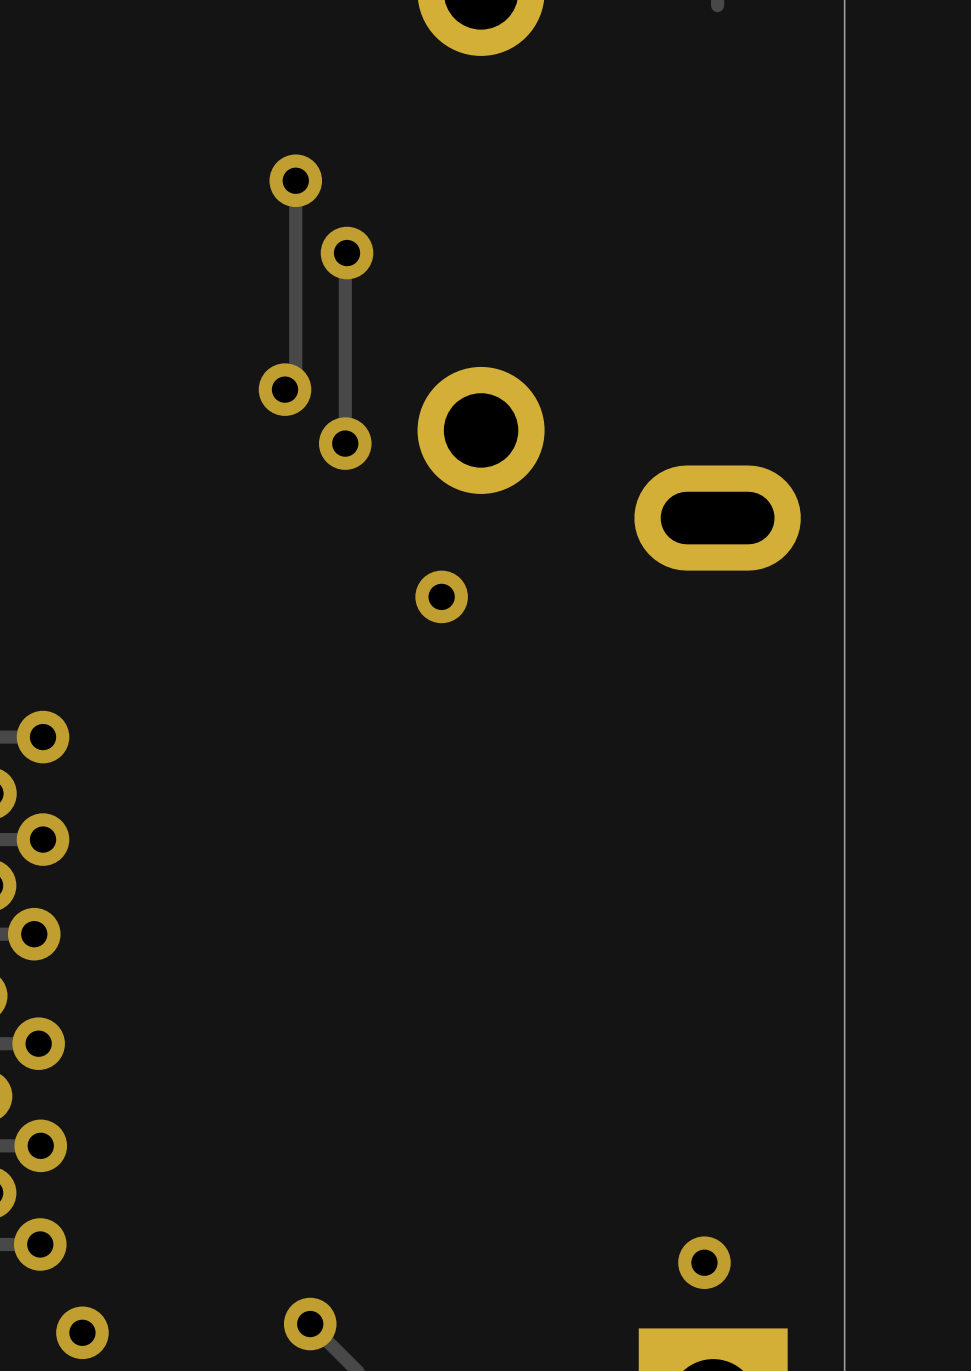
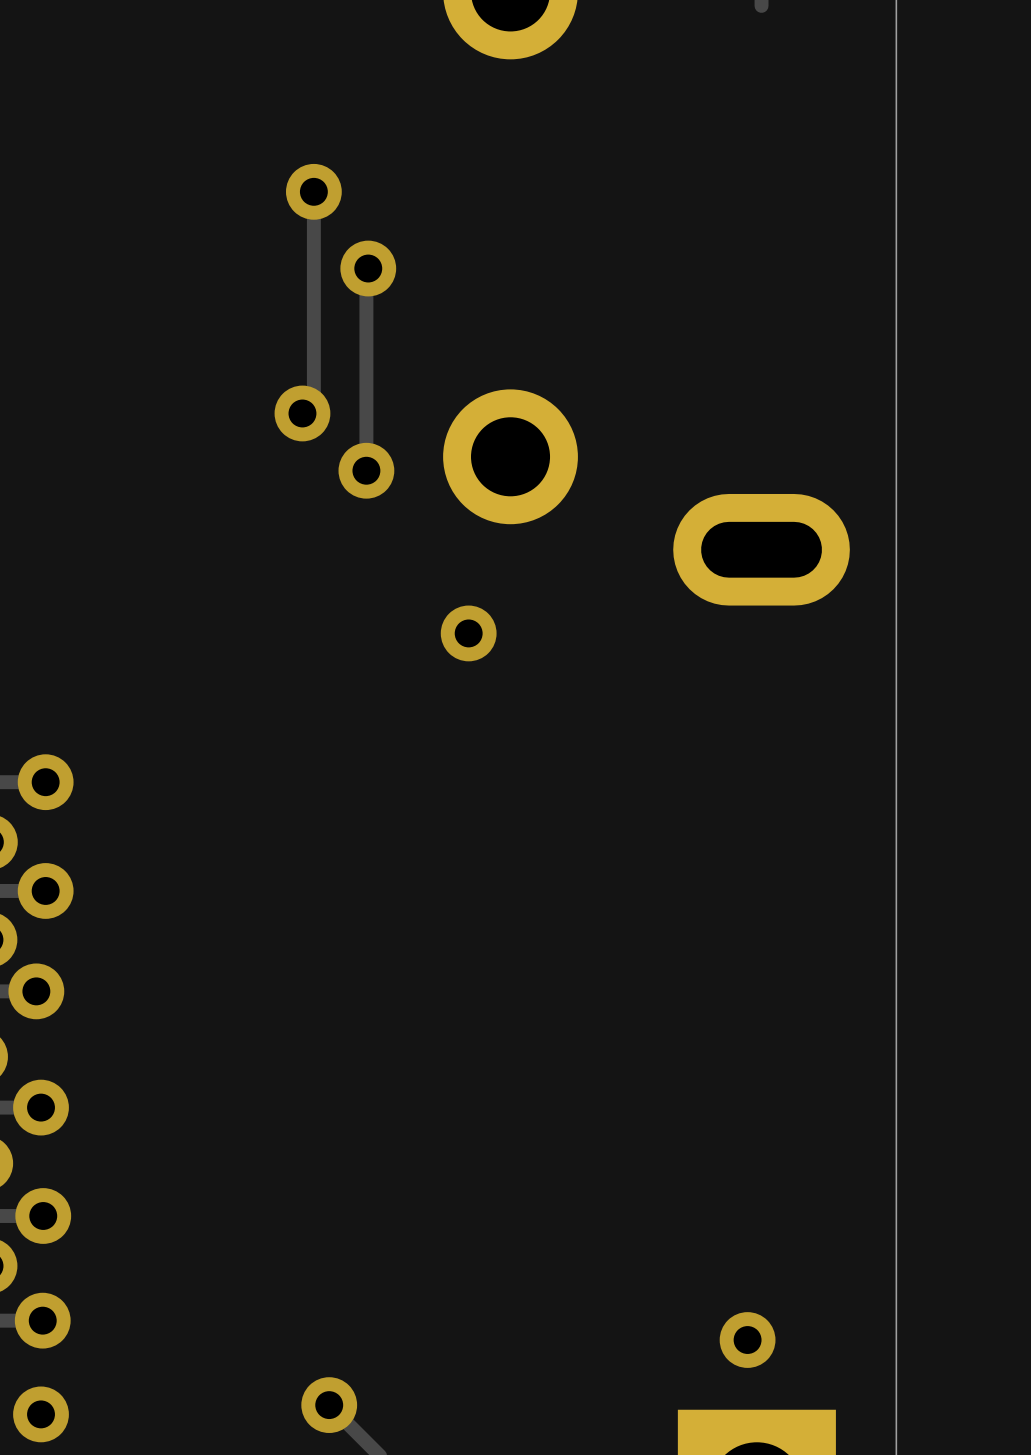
via position: (82, 1332) -> (41, 1414)

